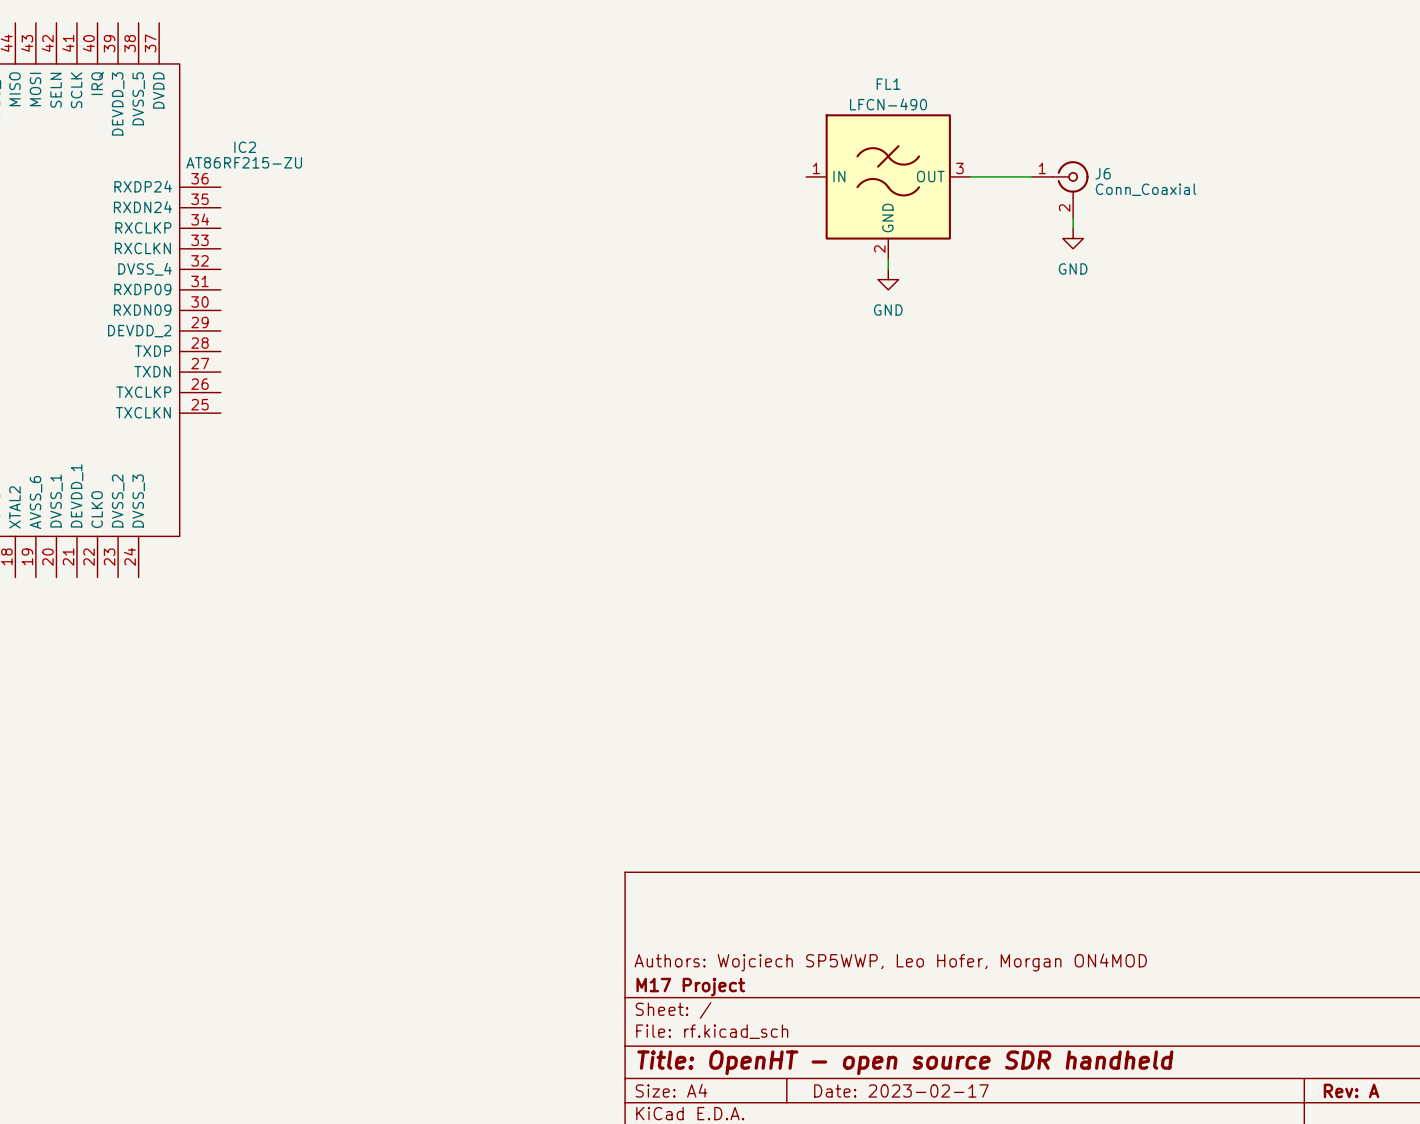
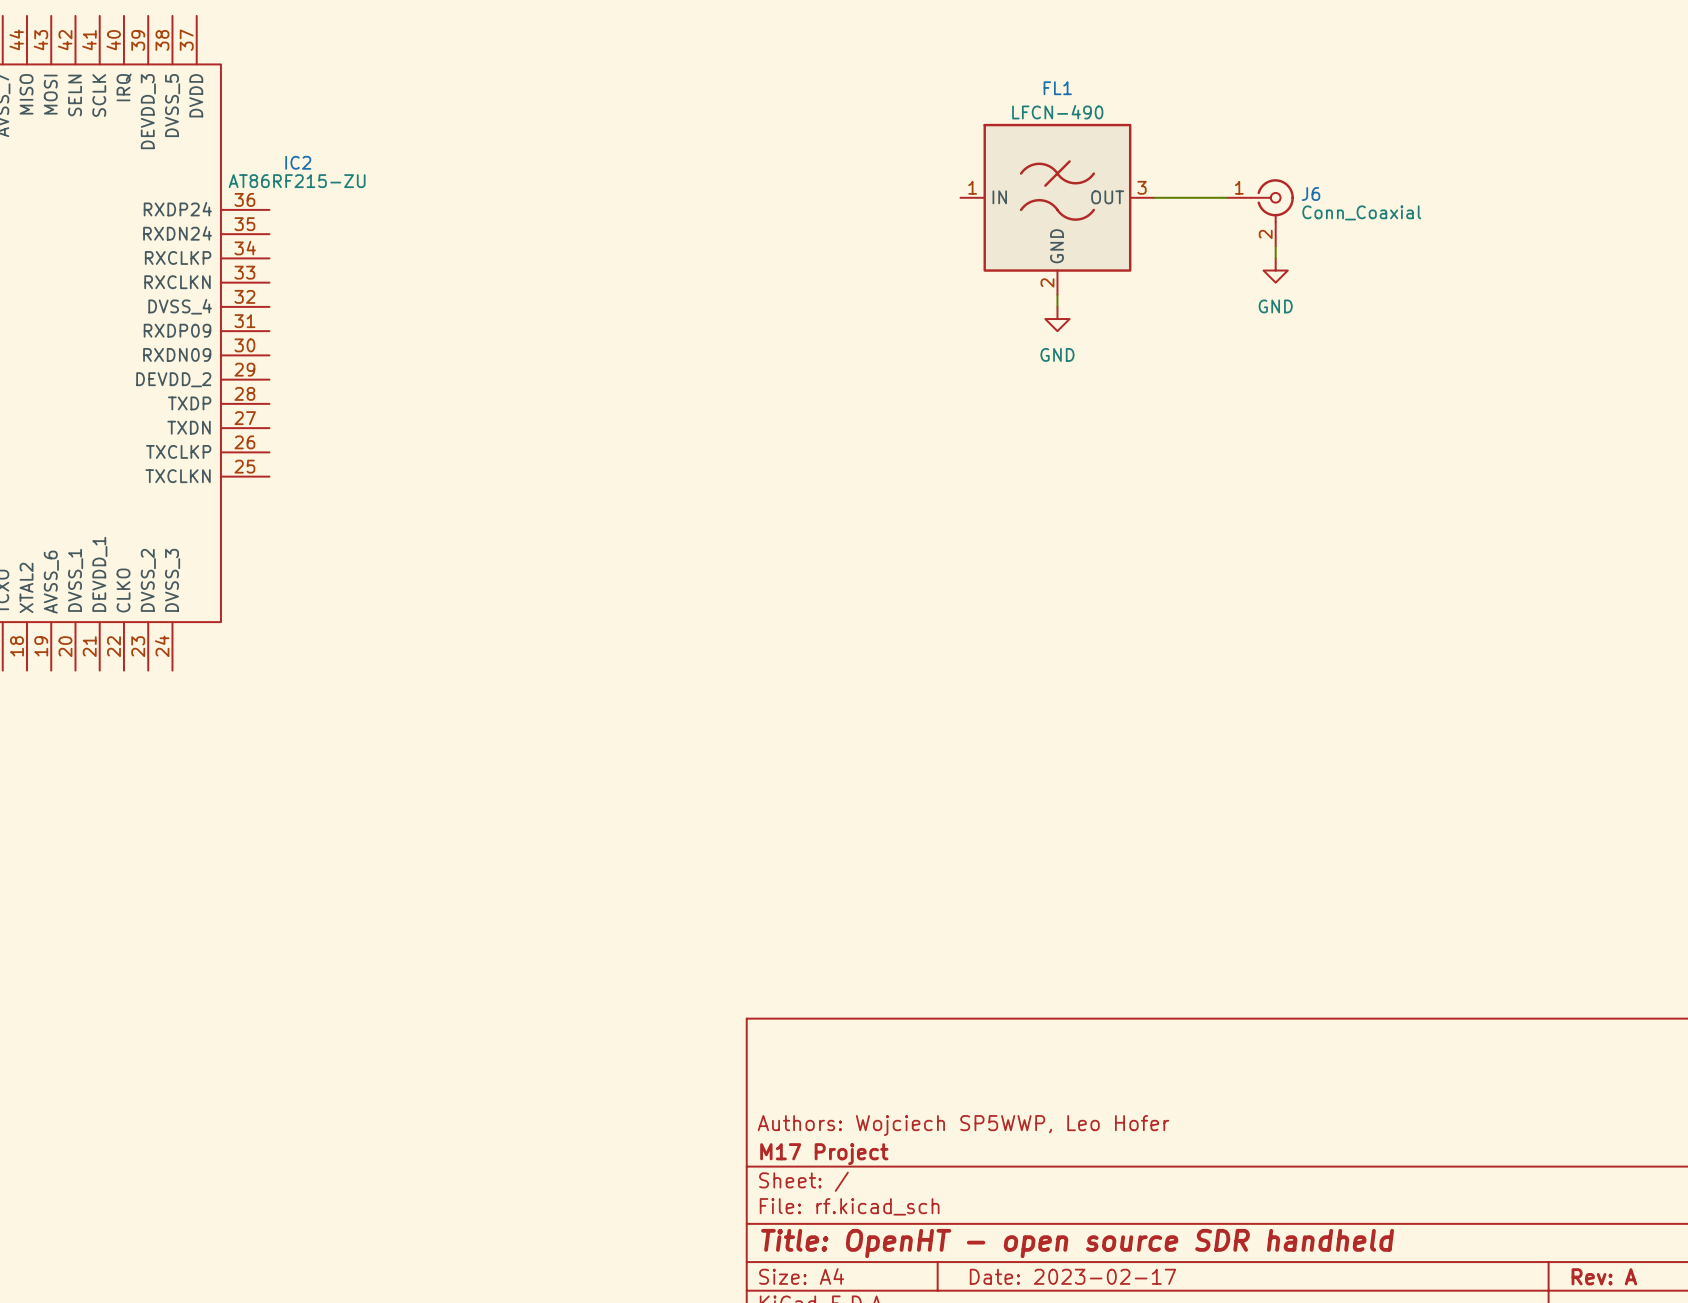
title block: Authors: Wojciech SP5WWP, Leo Hofer, Morgan ON4MOD (890, 962) -> Authors: Wojciech SP5WWP, Leo Hofer (963, 1125)

